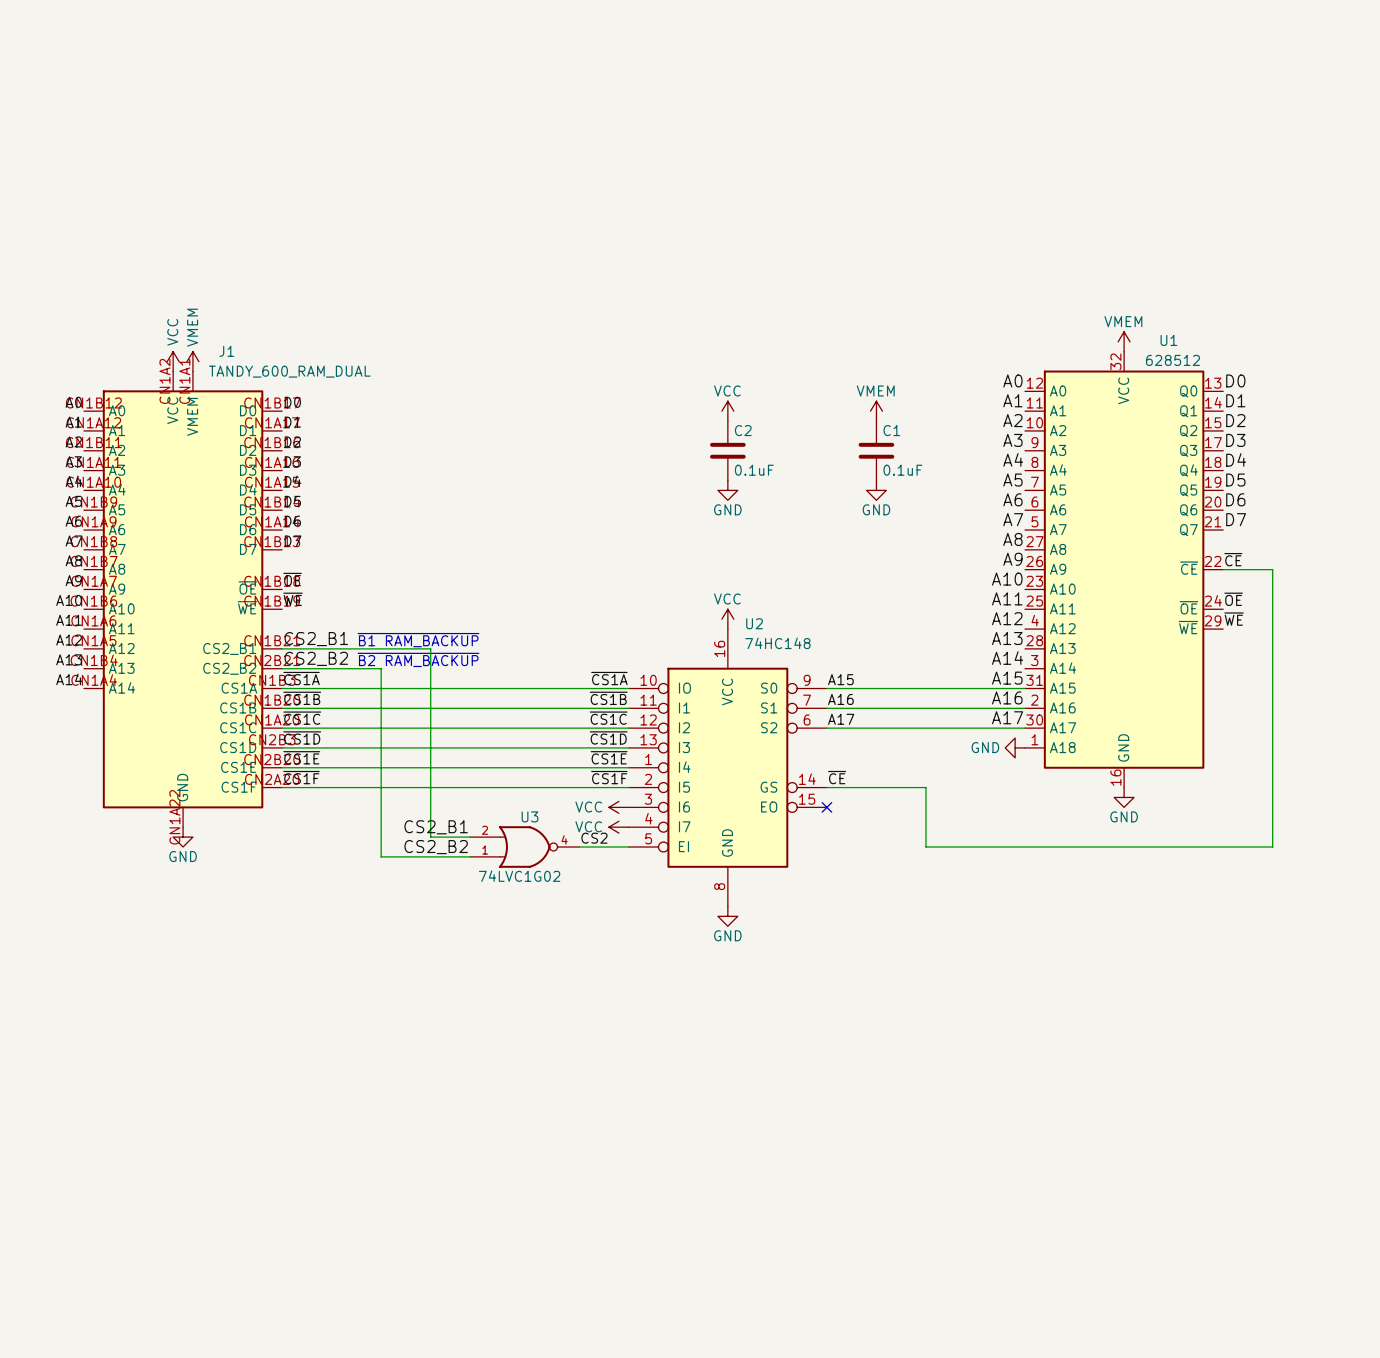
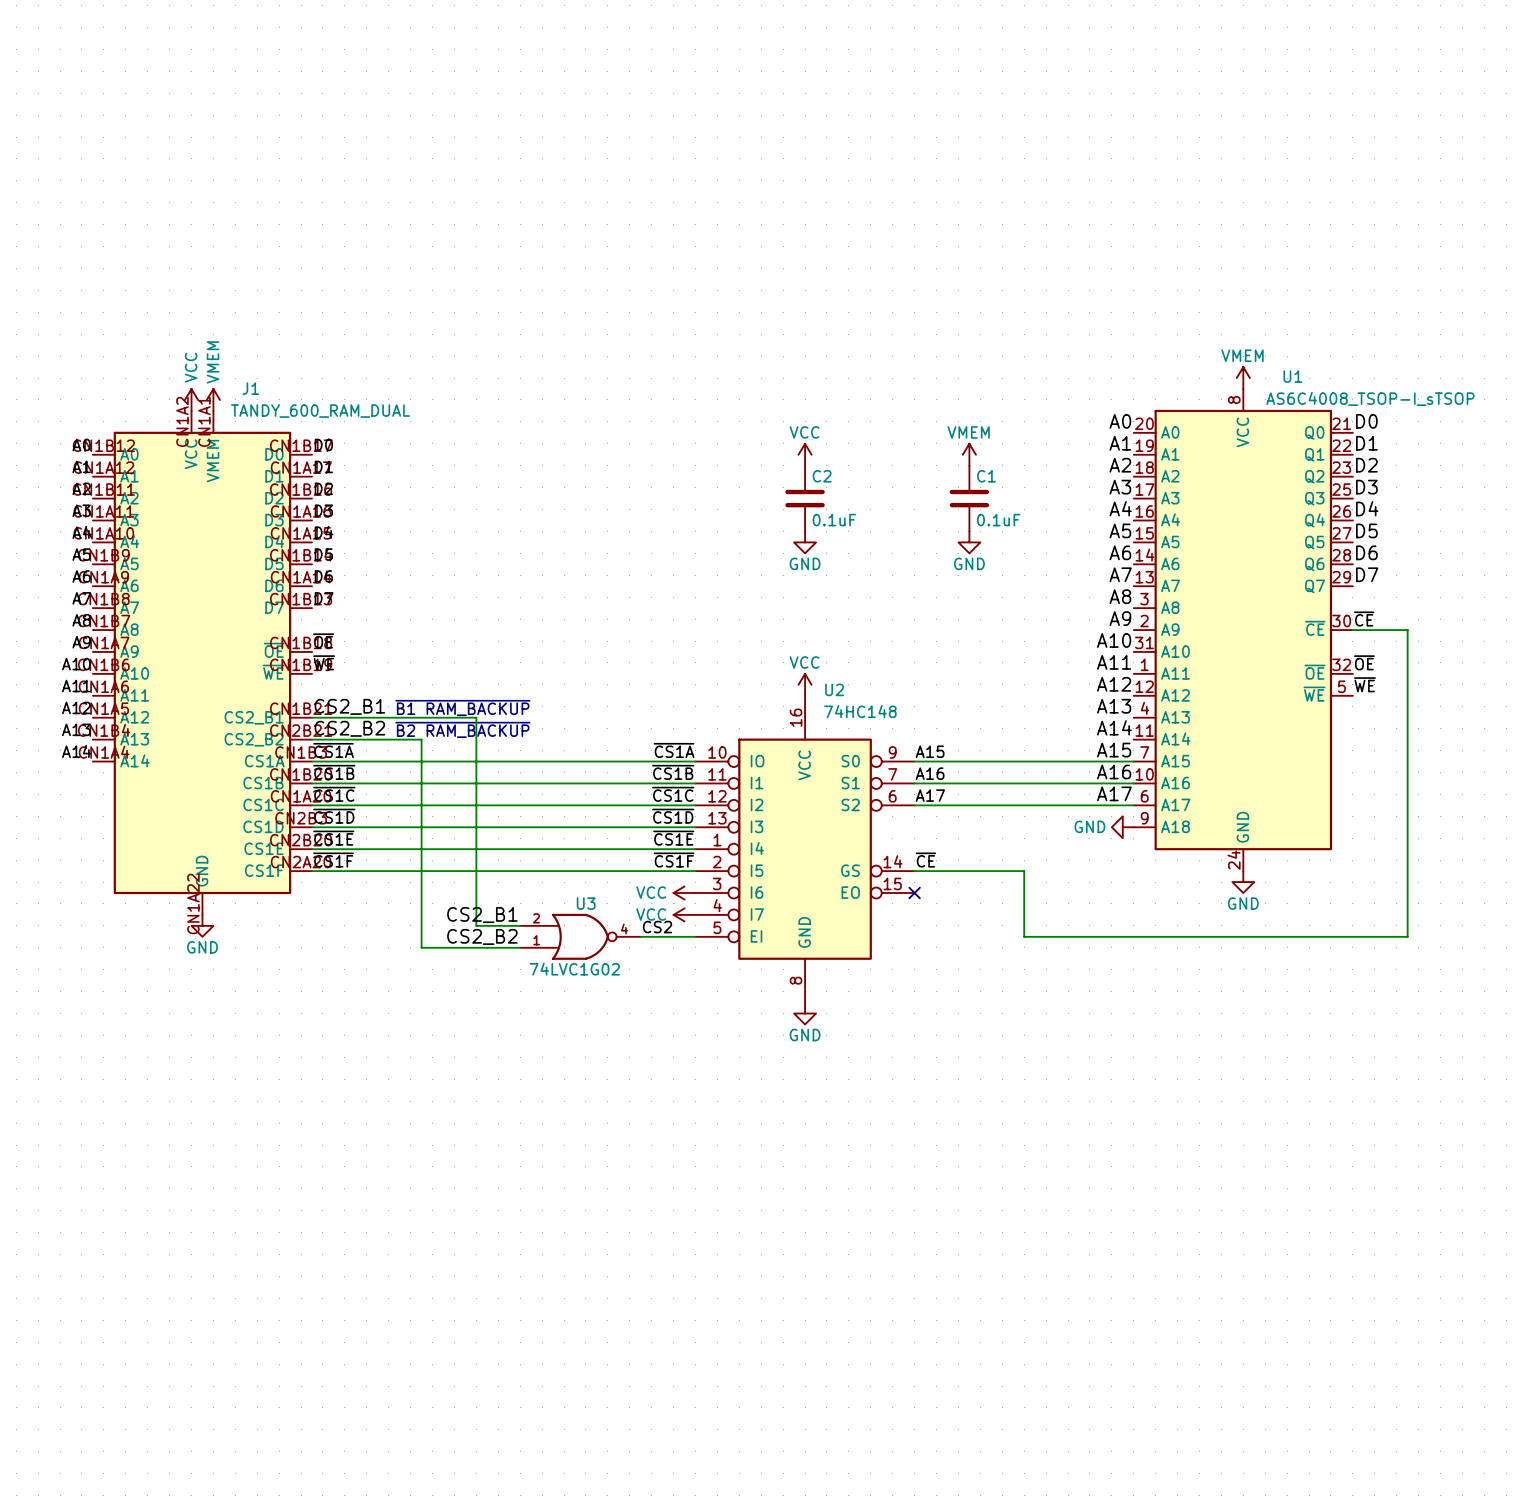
U1 symbol: [1025, 351, 1224, 788] -> [1133, 389, 1353, 872]
U1 value: 628512 (1172, 360) -> AS6C4008_TSOP-I_sTSOP (1370, 398)

